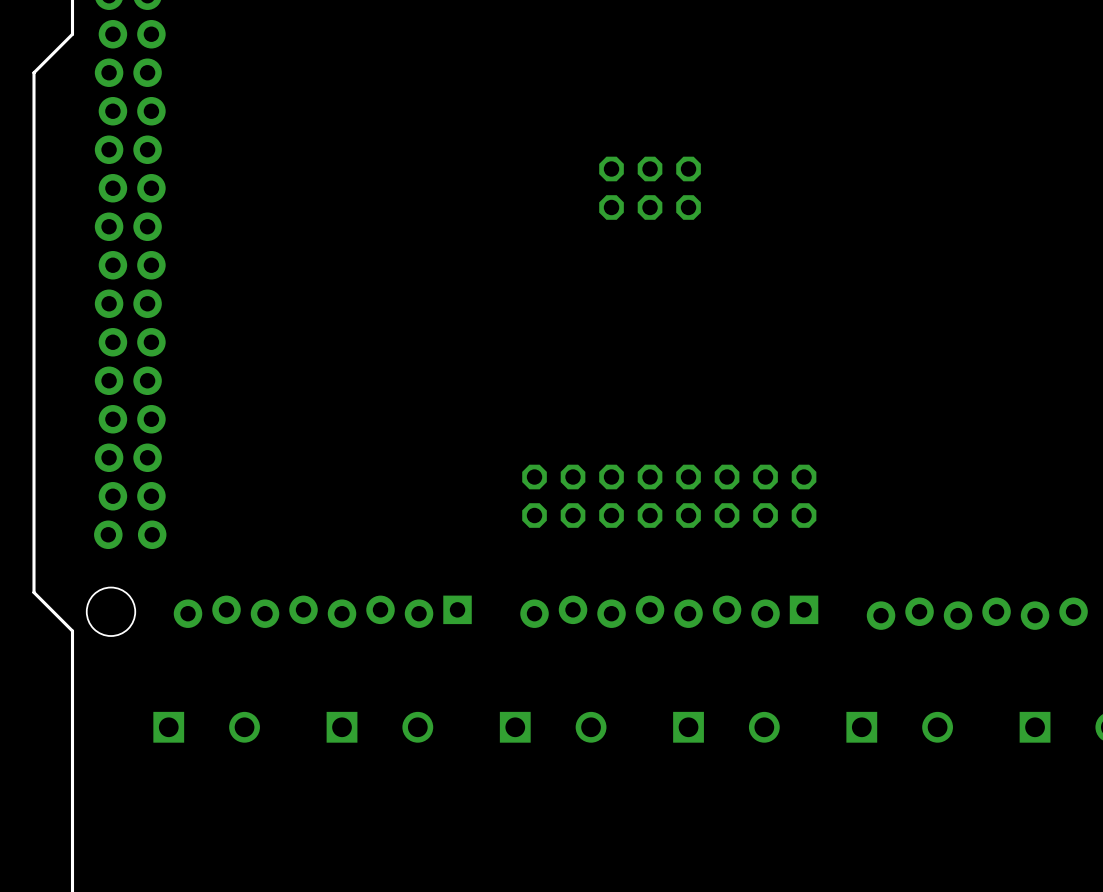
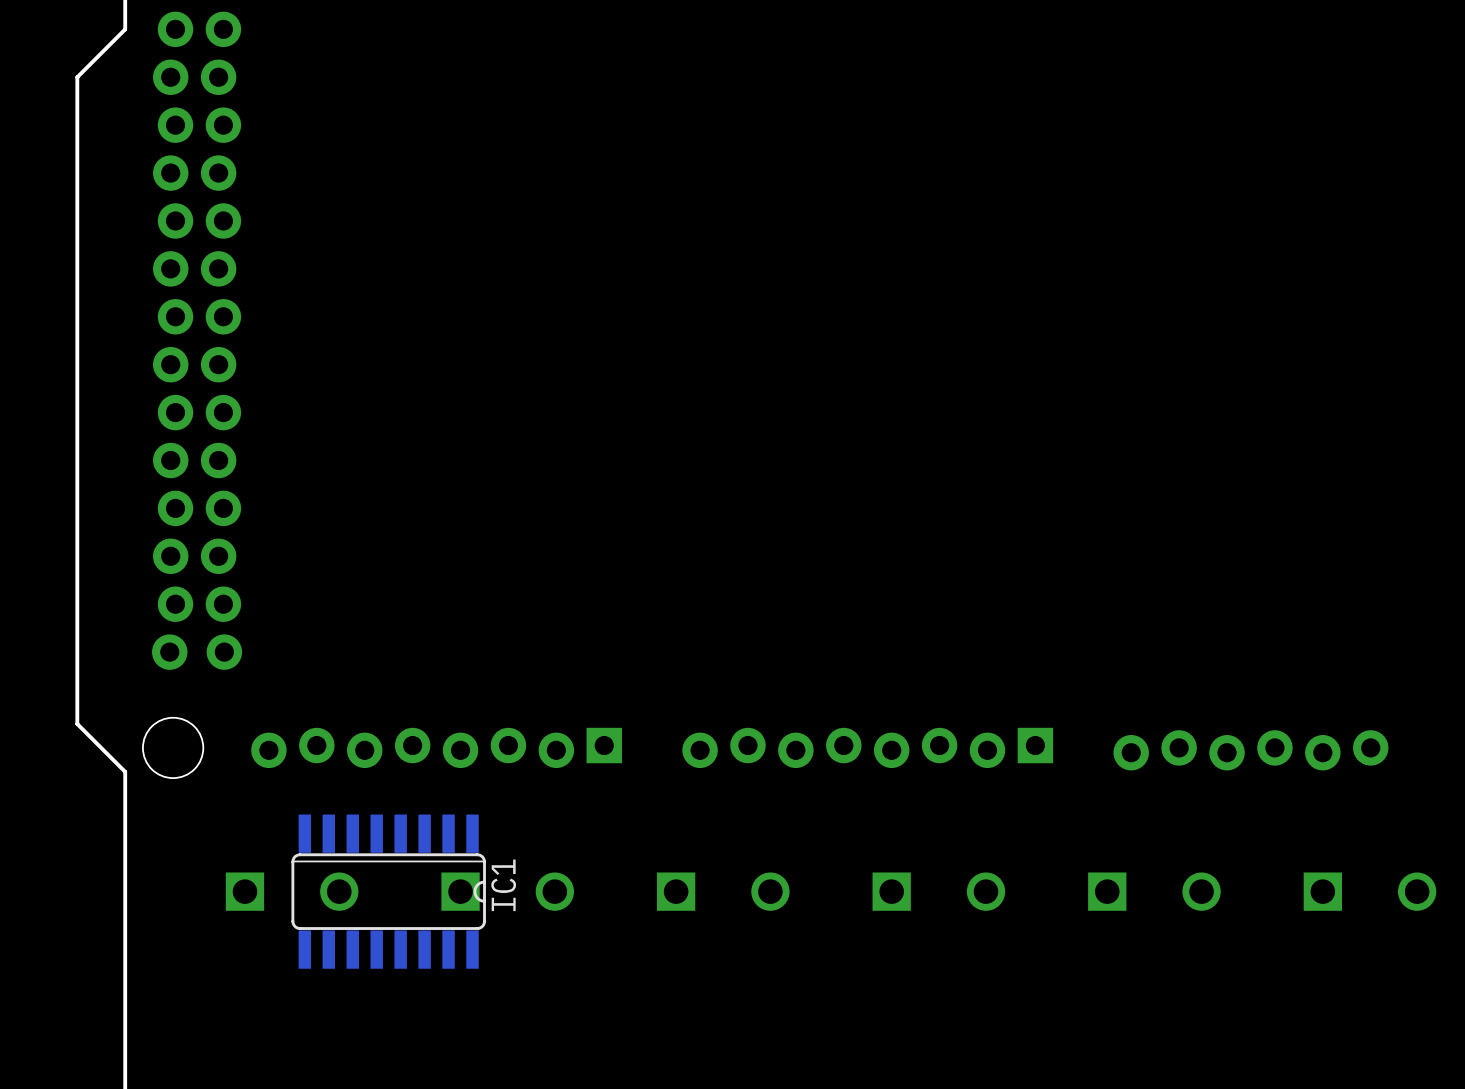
part: (650, 188) -> none
part: (669, 496) -> none
IC1: none -> (388, 891)

